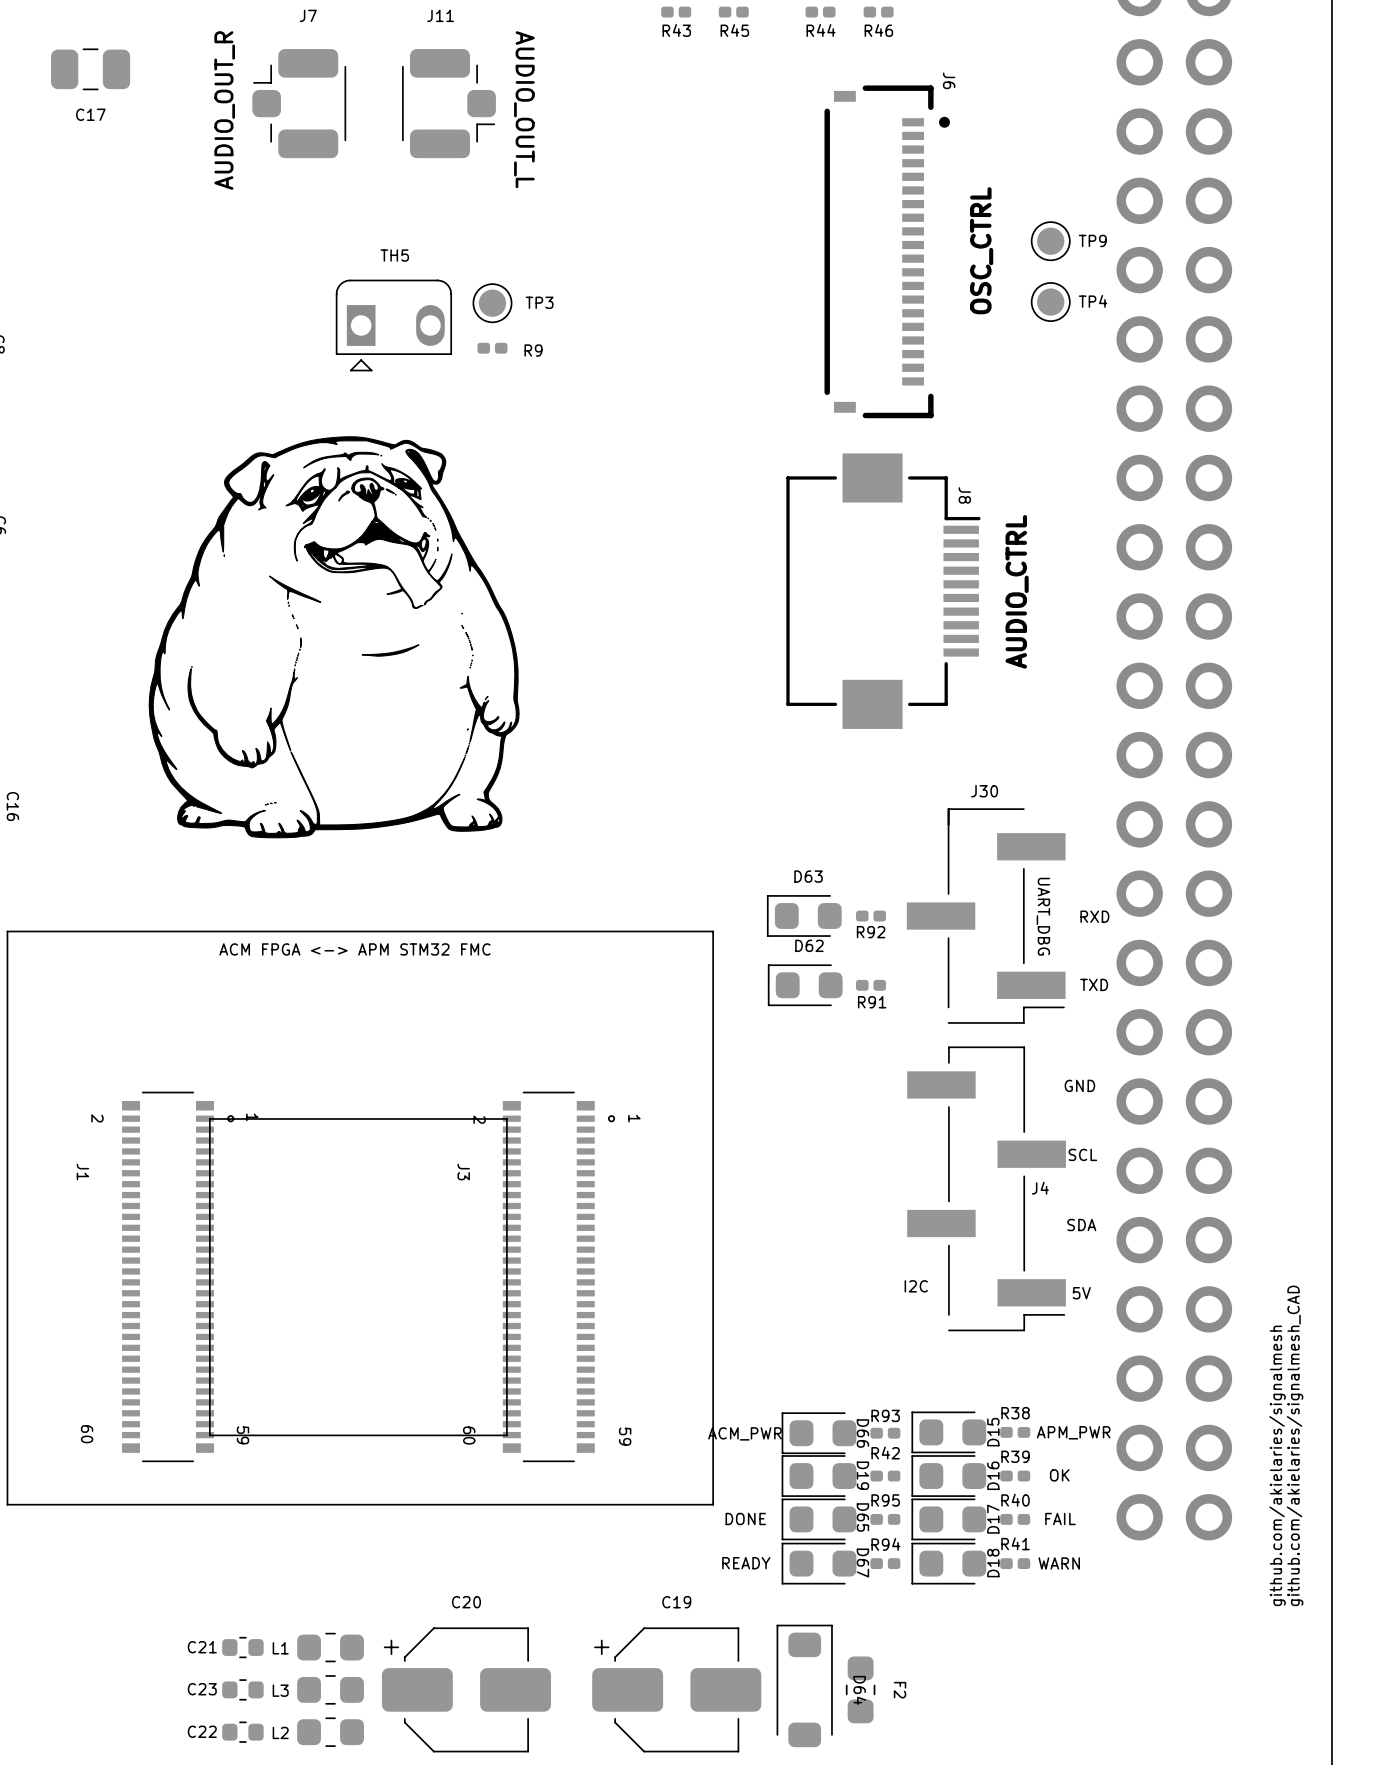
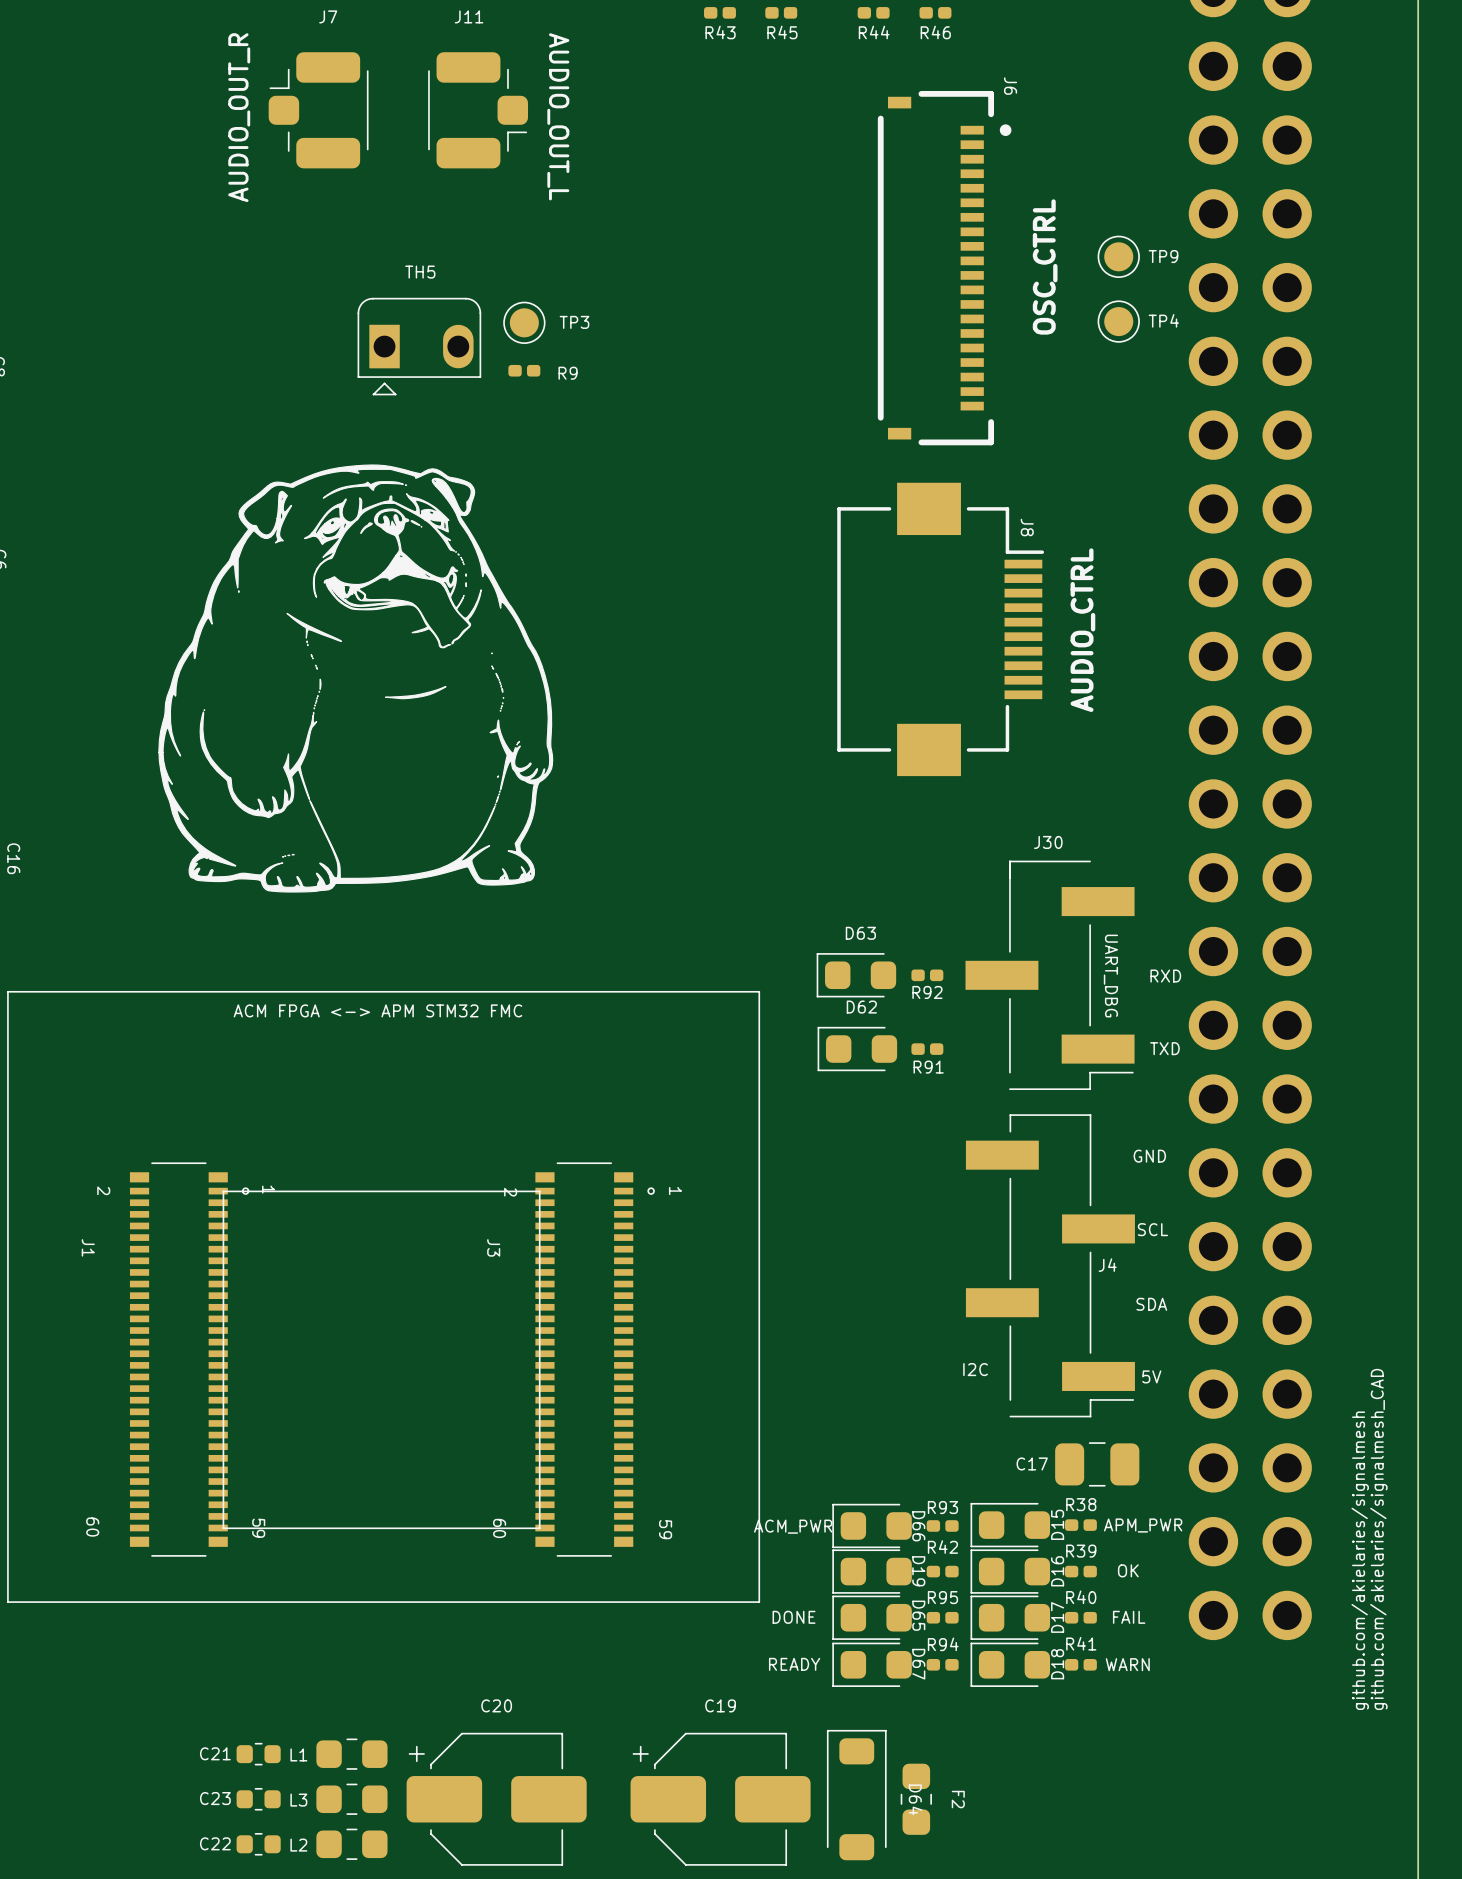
C17 position: (90, 69) -> (1097, 1464)
C17 name position: C17 (90, 114) -> C17 (1032, 1463)

